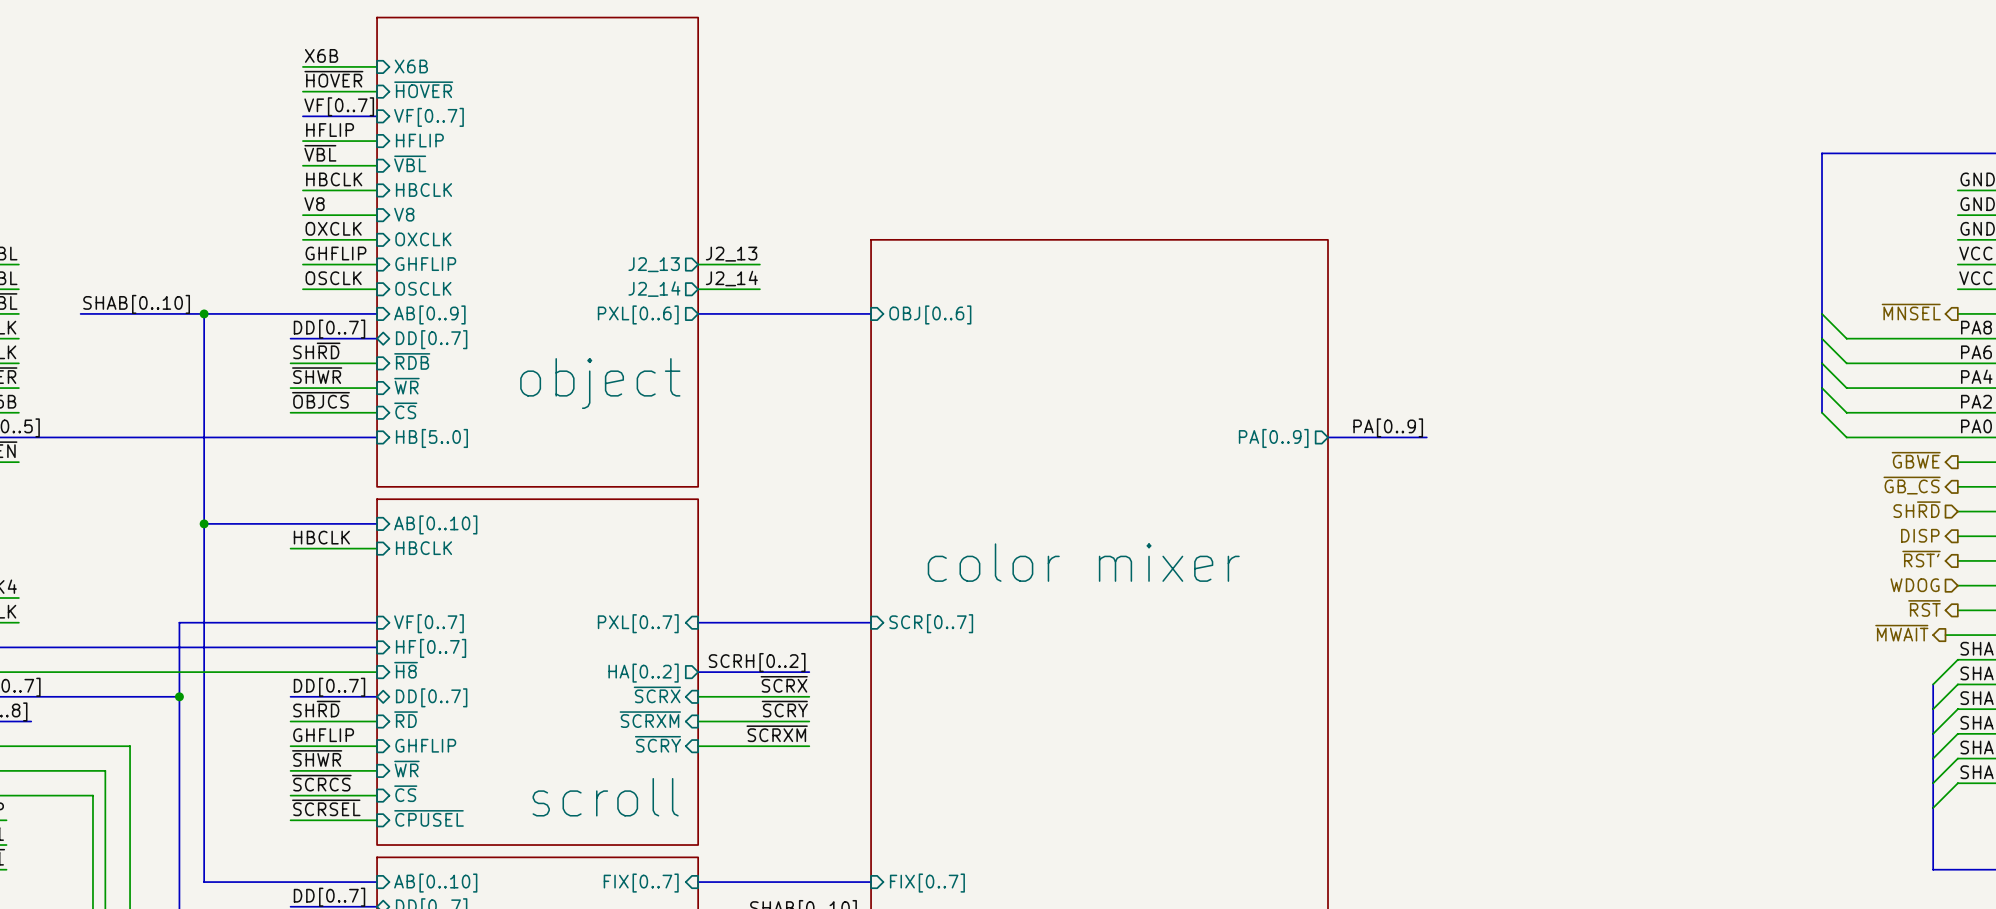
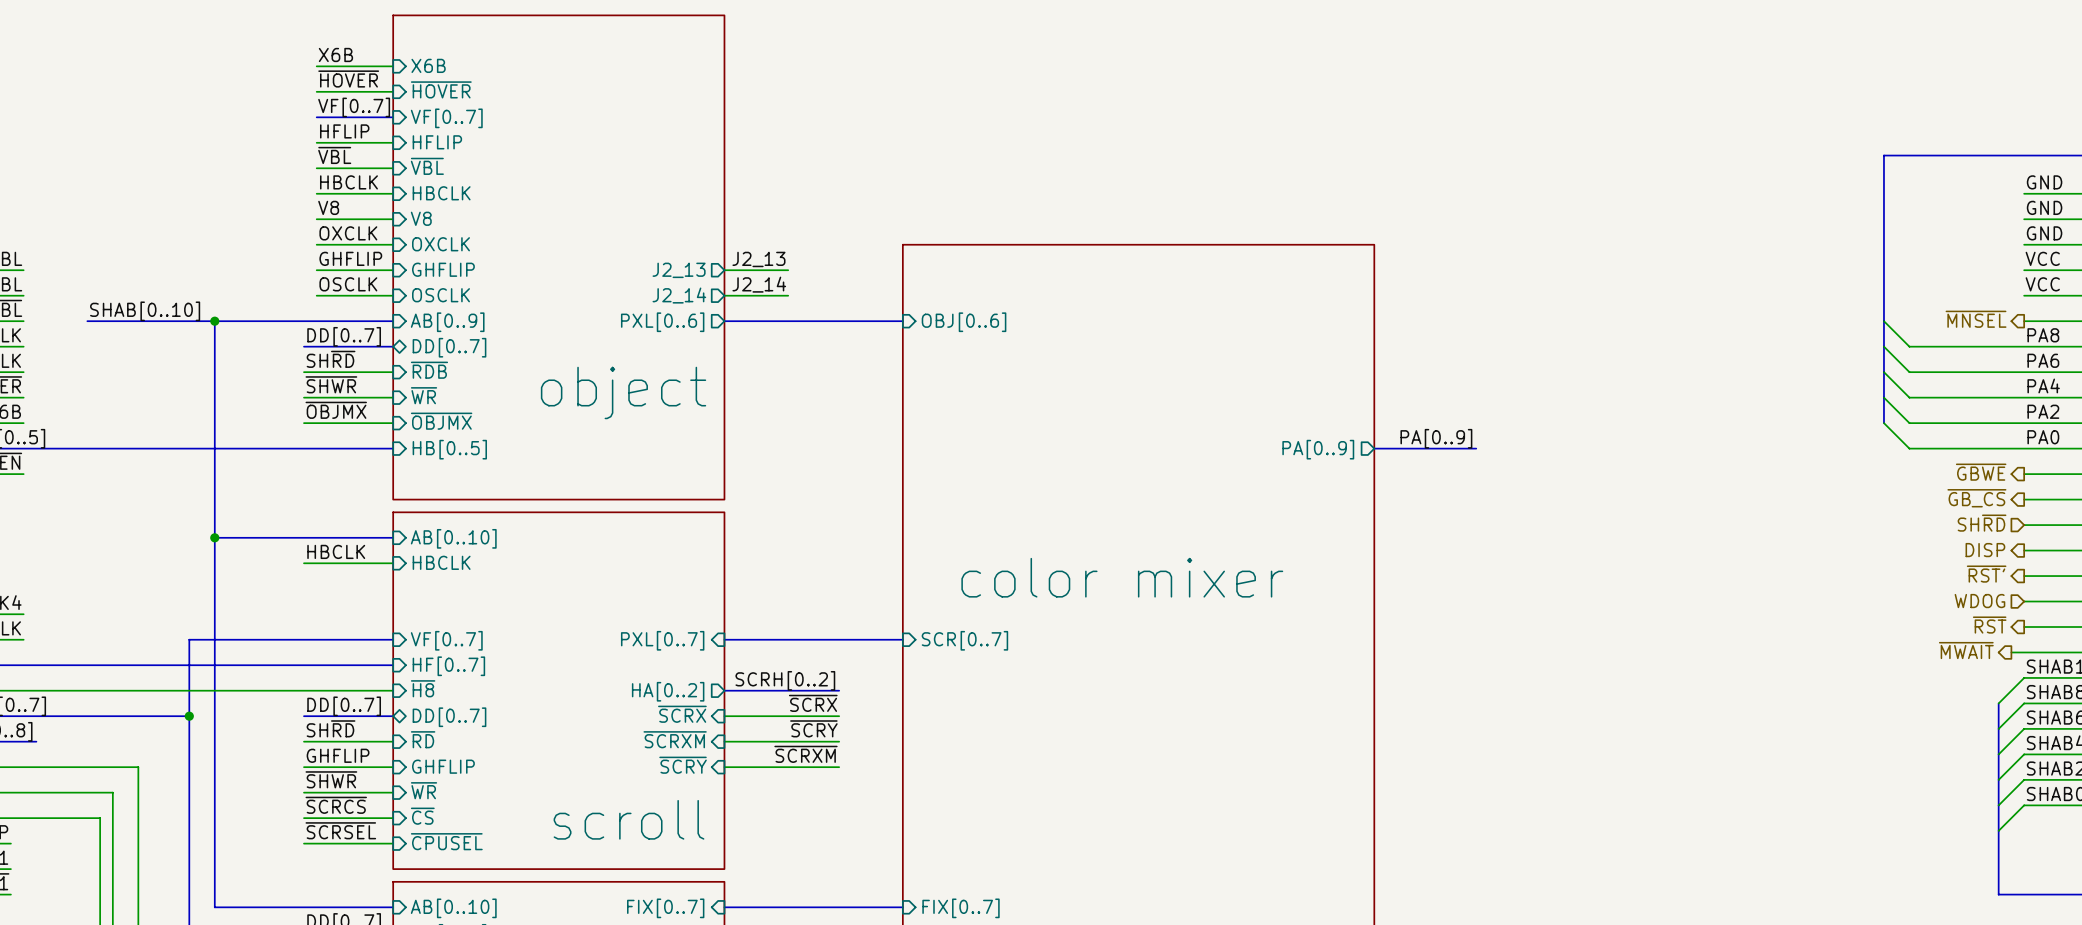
label: ~{OBJCS} (320, 400) -> ~{OBJMX} (336, 410)
sheet pin: ~{CS} (405, 410) -> ~{OBJMX} (441, 421)
sheet pin: HB[5..0] (431, 438) -> HB[0..5] (449, 449)

